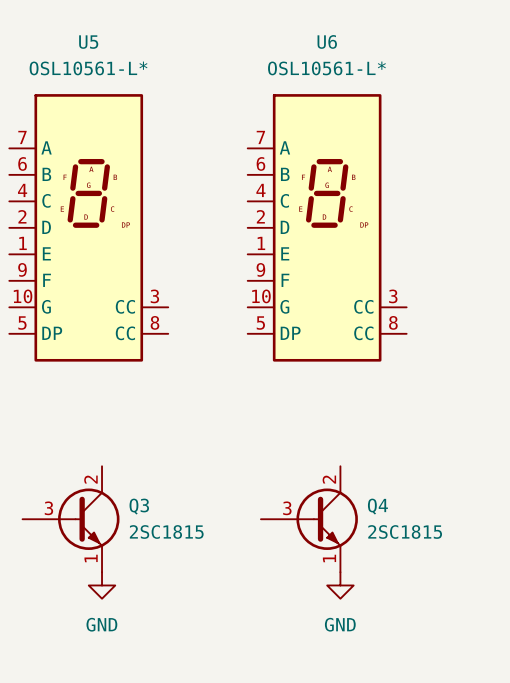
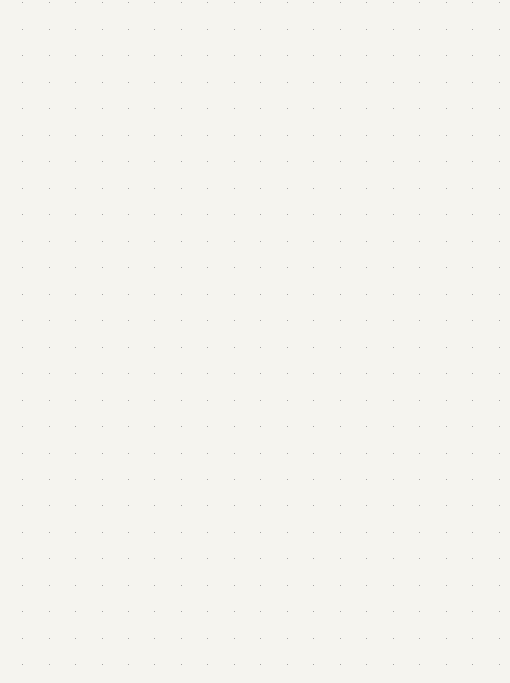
U5: OSL10561-L* (88, 227) -> none
U6: OSL10561-L* (327, 227) -> none
Q3: 2SC1815 (71, 519) -> none
Q4: 2SC1815 (309, 519) -> none
power symbol: GND (102, 585) -> none
power symbol: GND (340, 585) -> none

